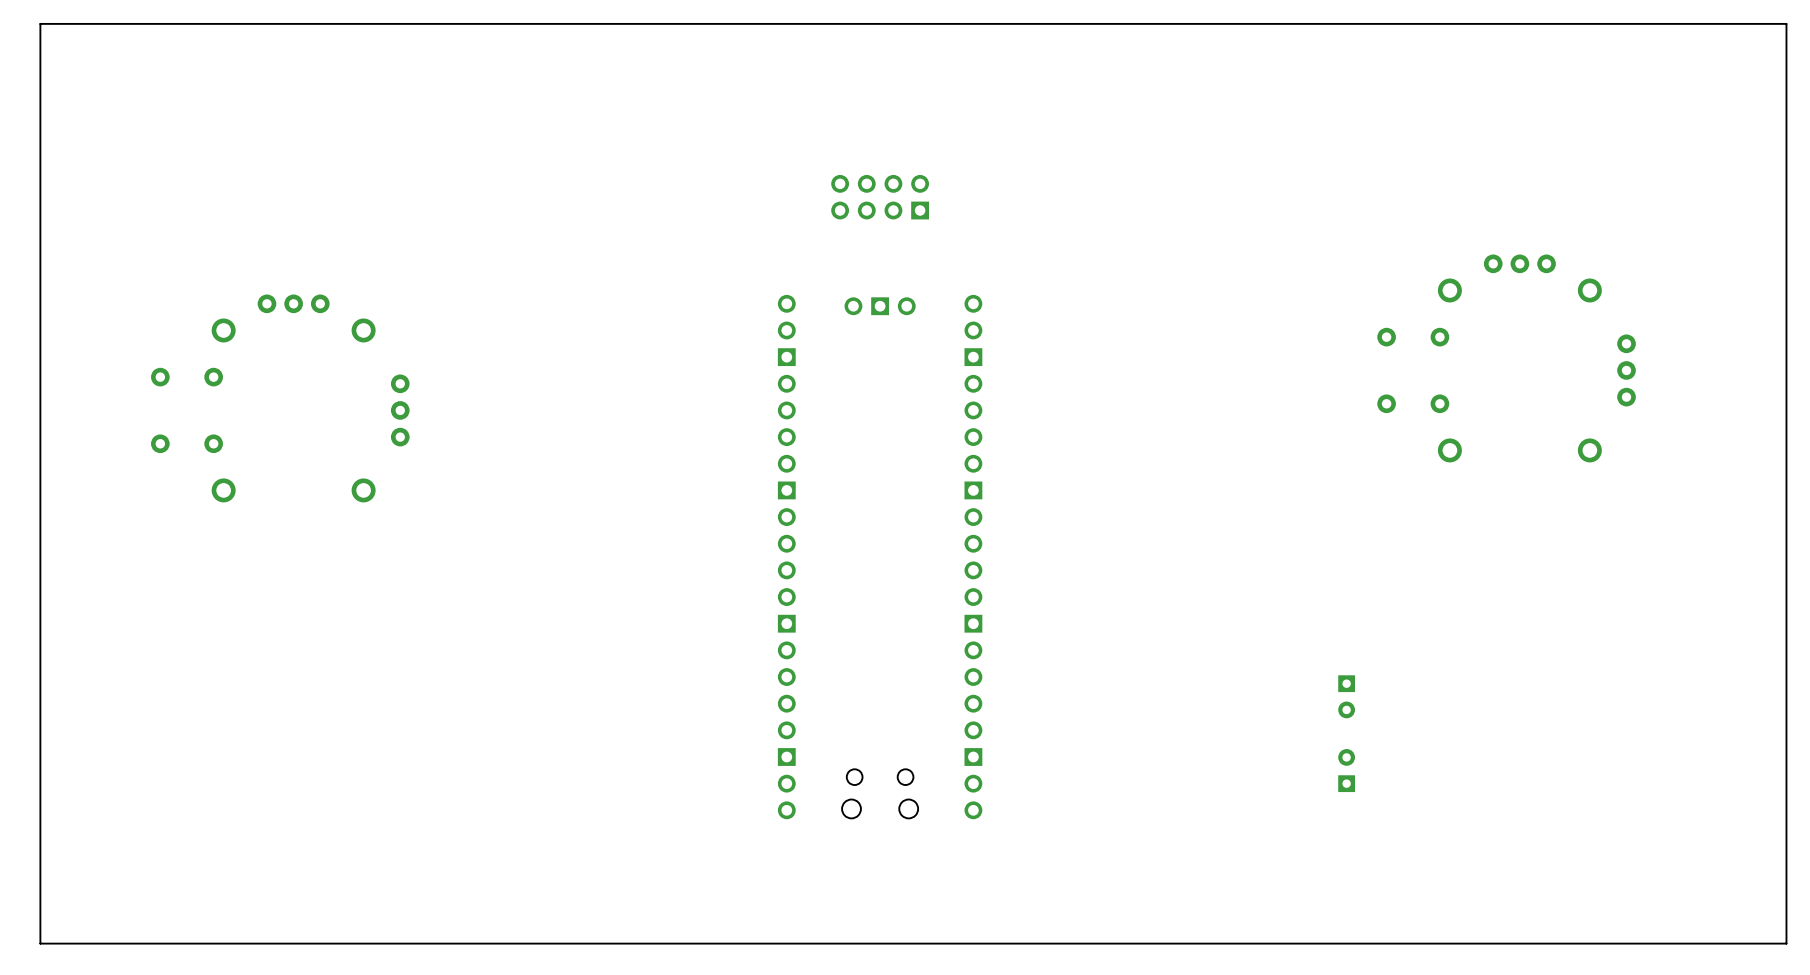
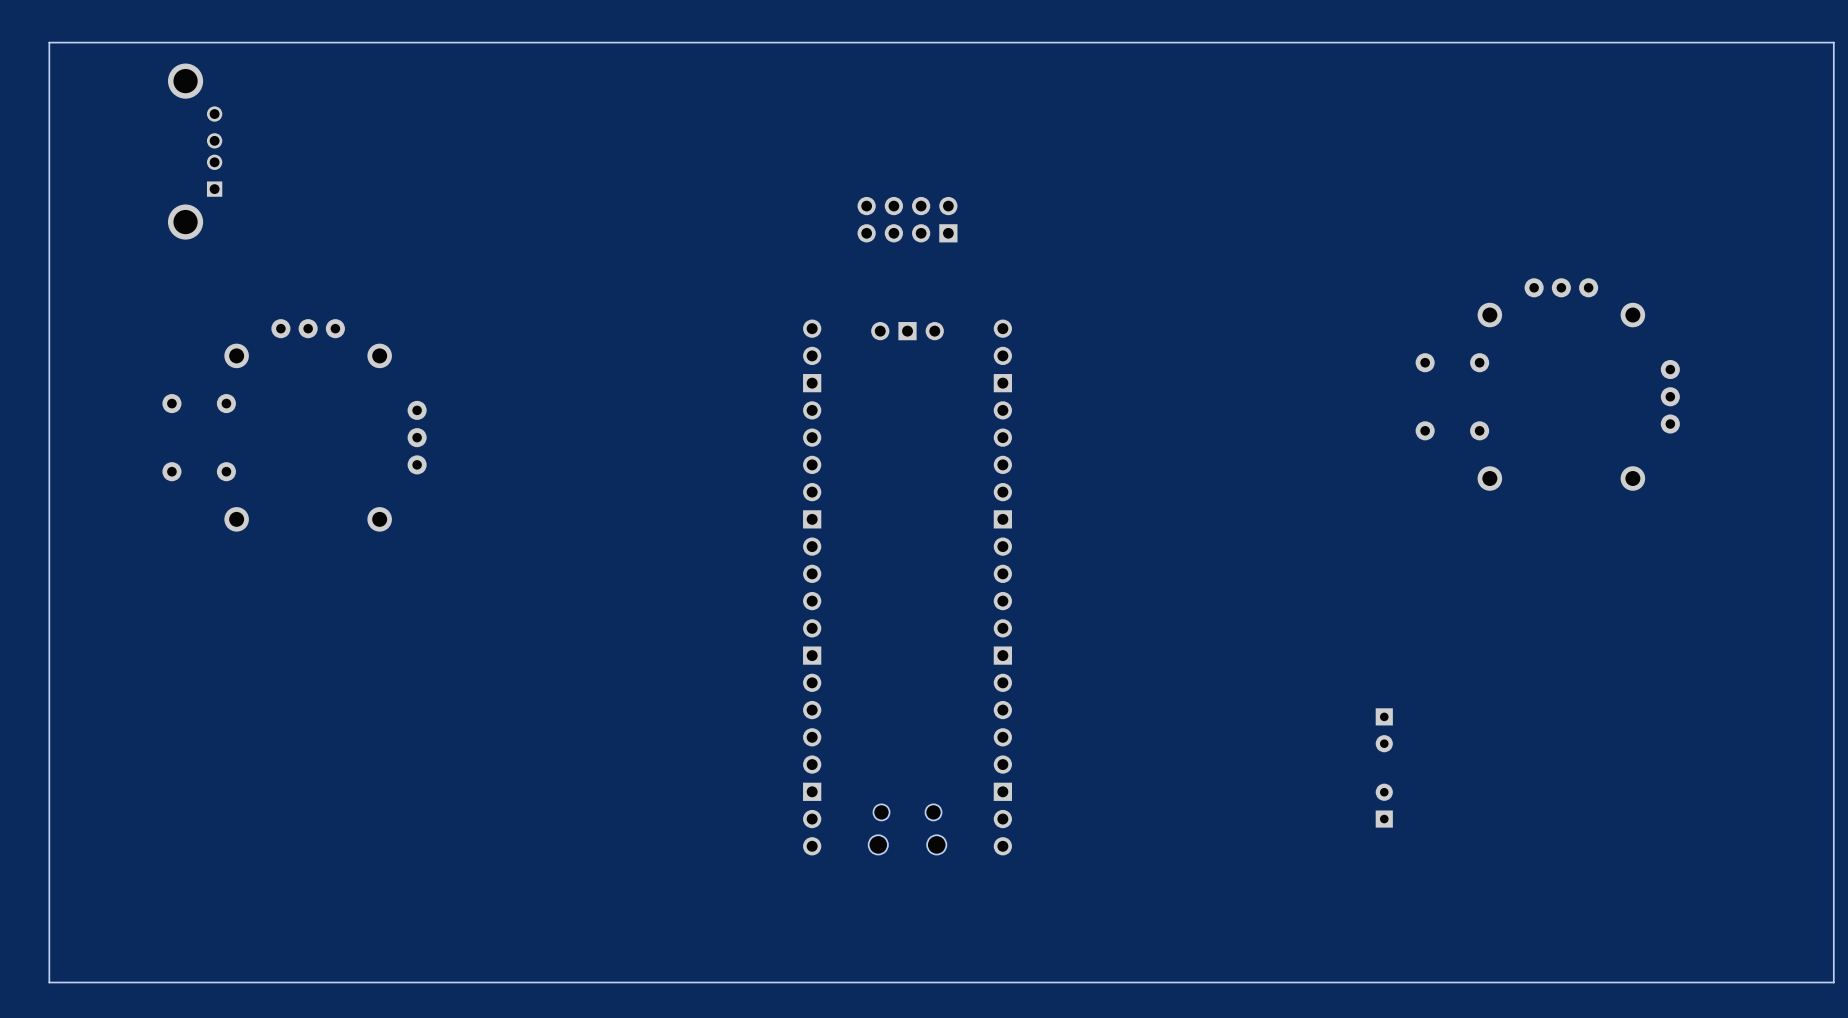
part: none -> (195, 151)

